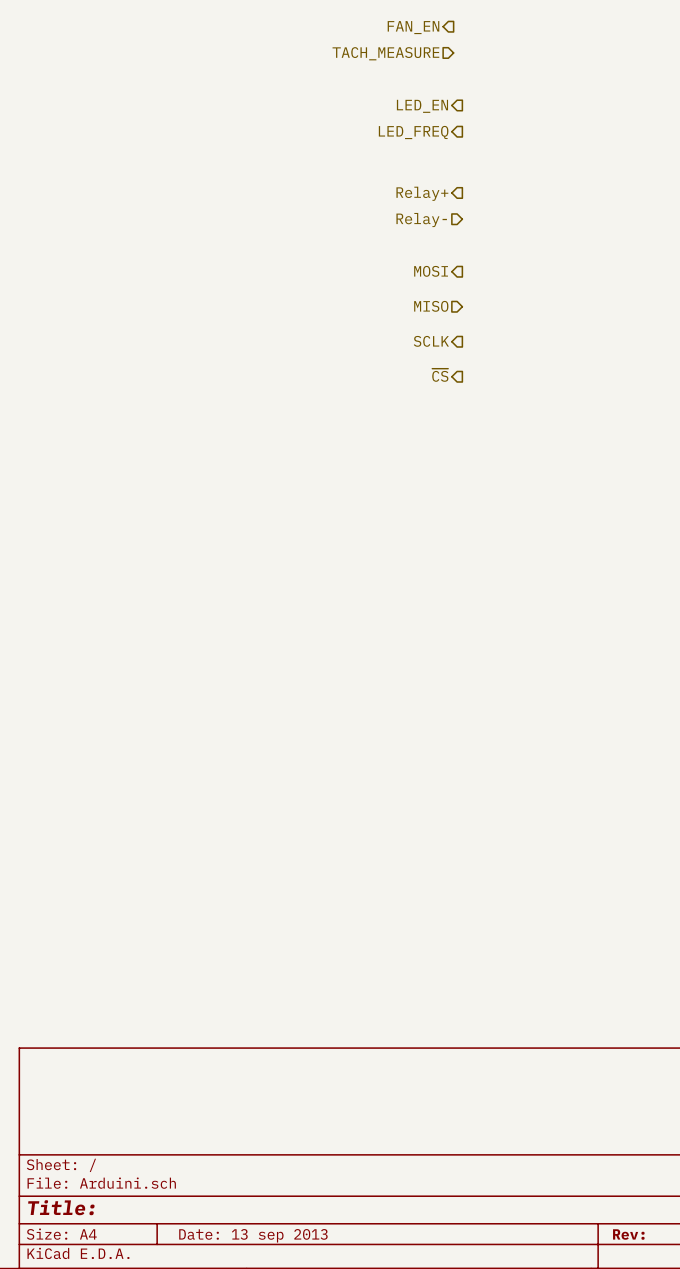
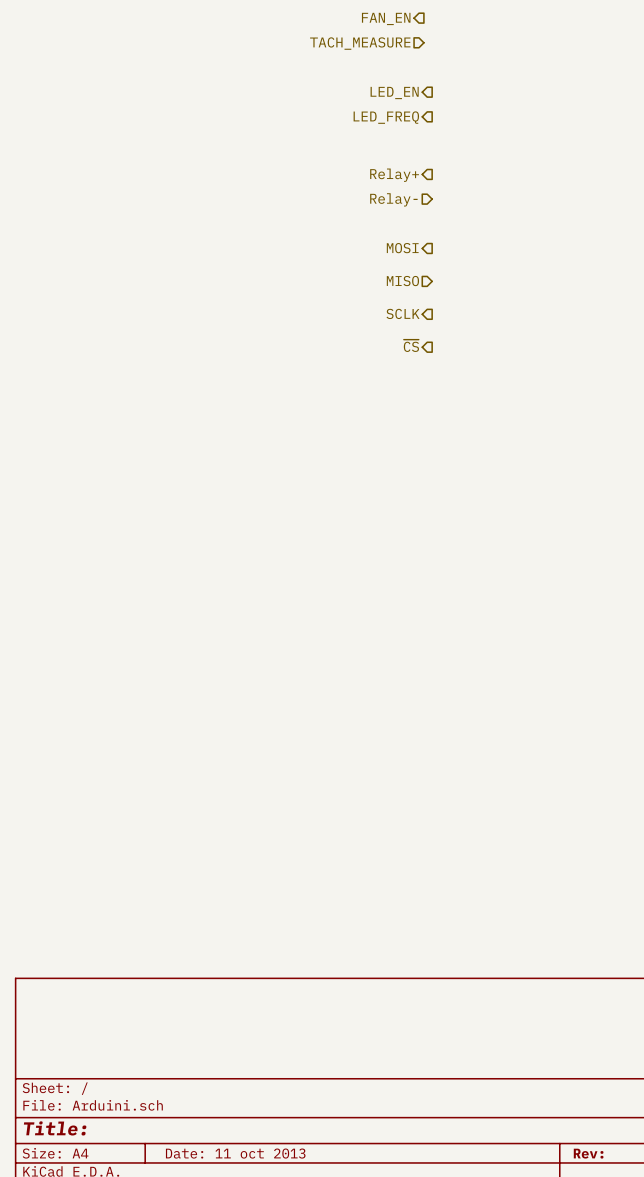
title block: Date: 13 sep 2013 (253, 1235) -> Date: 11 oct 2013 (235, 1153)

